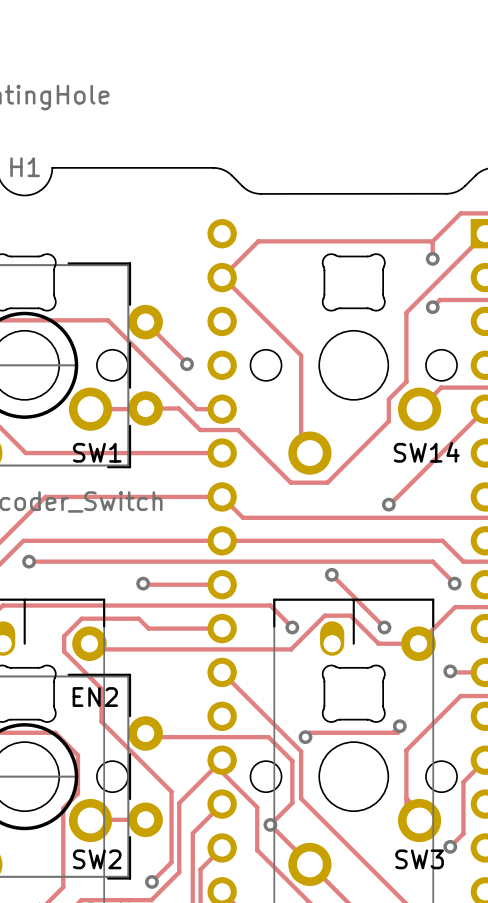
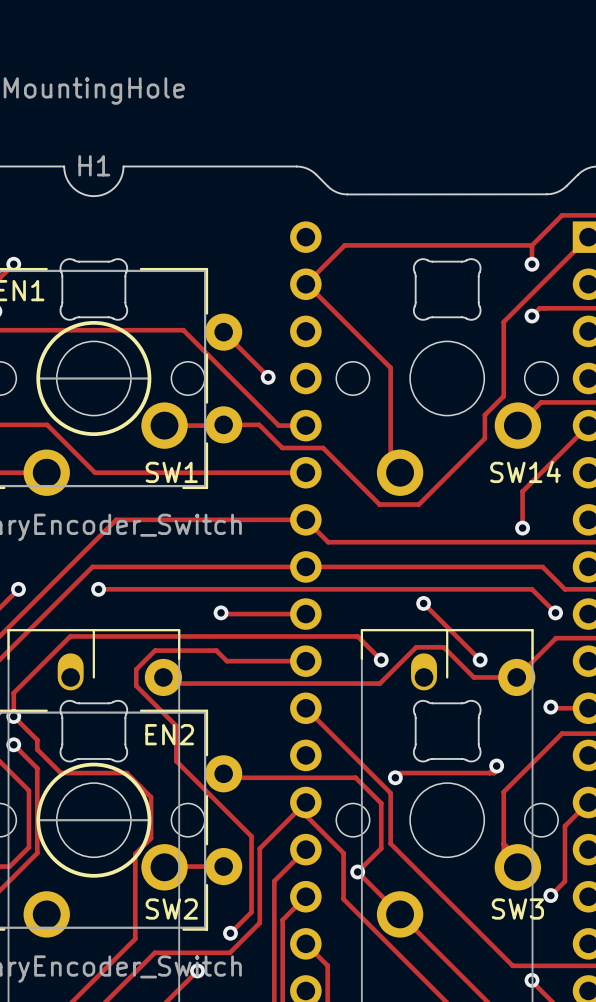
track: (423, 470) (388, 504) -> (522, 491) (522, 528)
via position: (388, 504) -> (522, 528)

